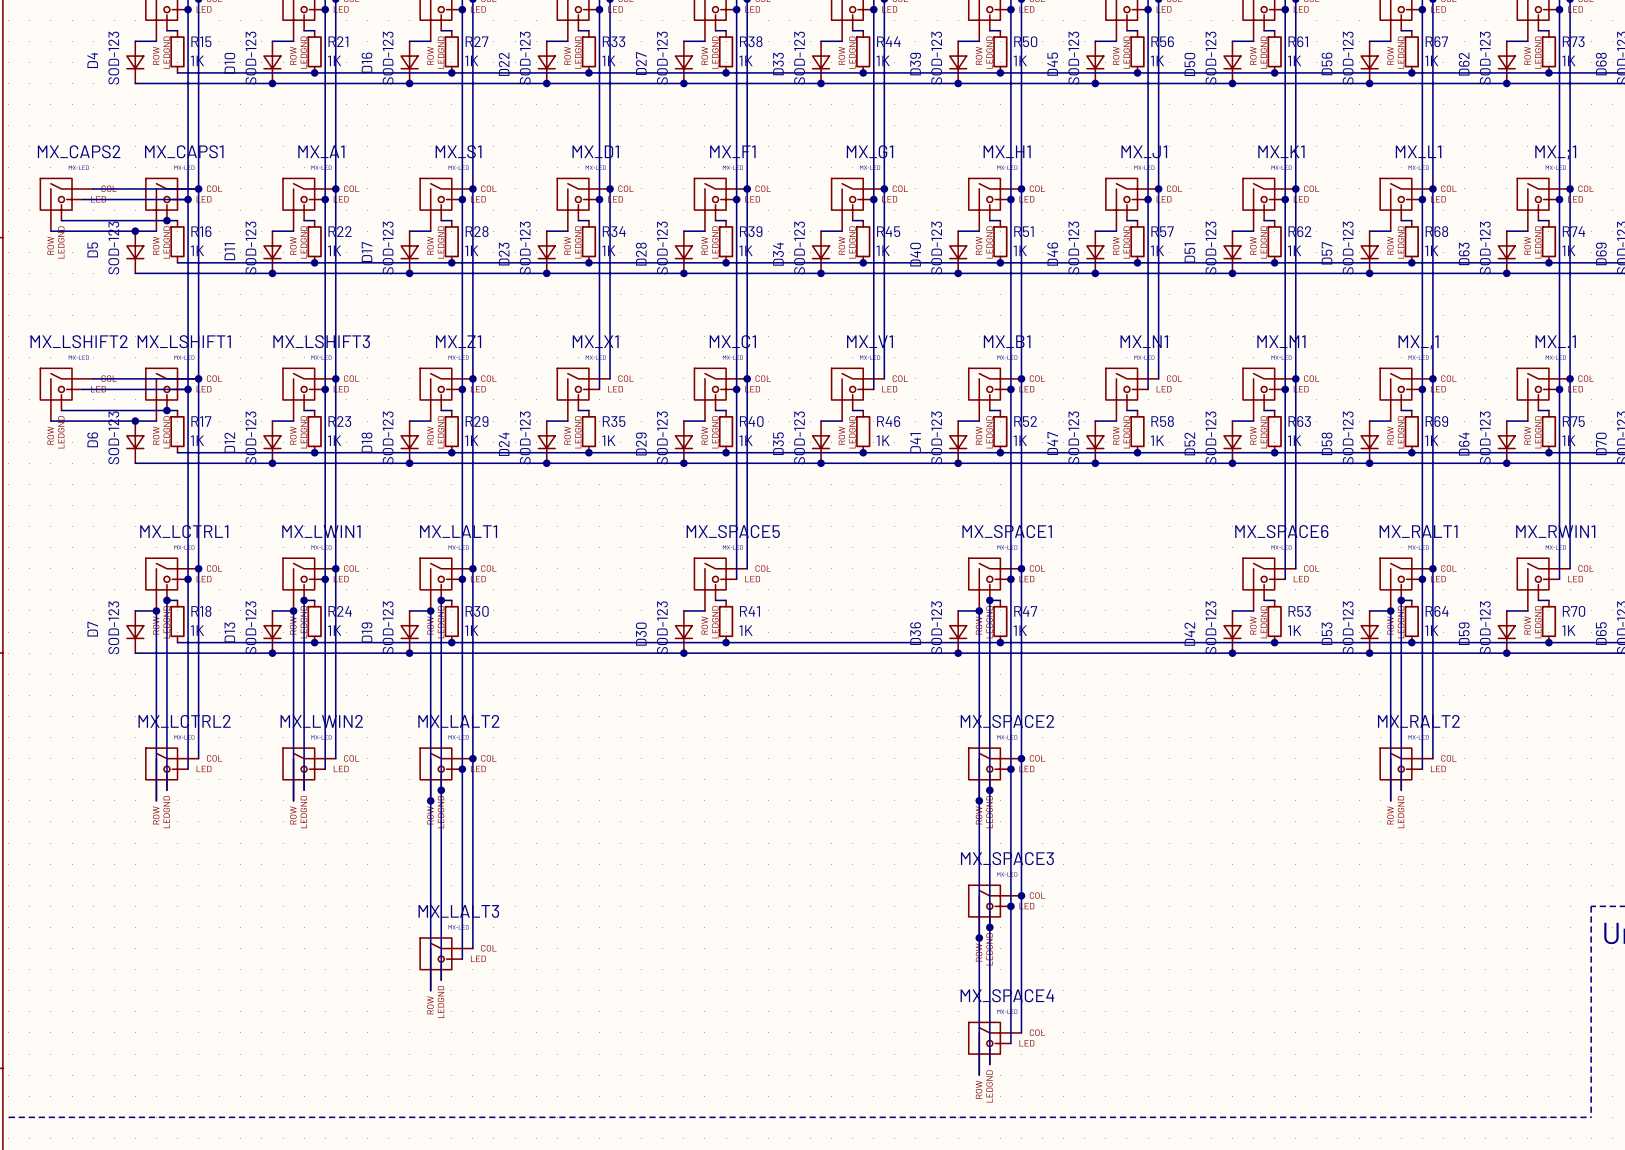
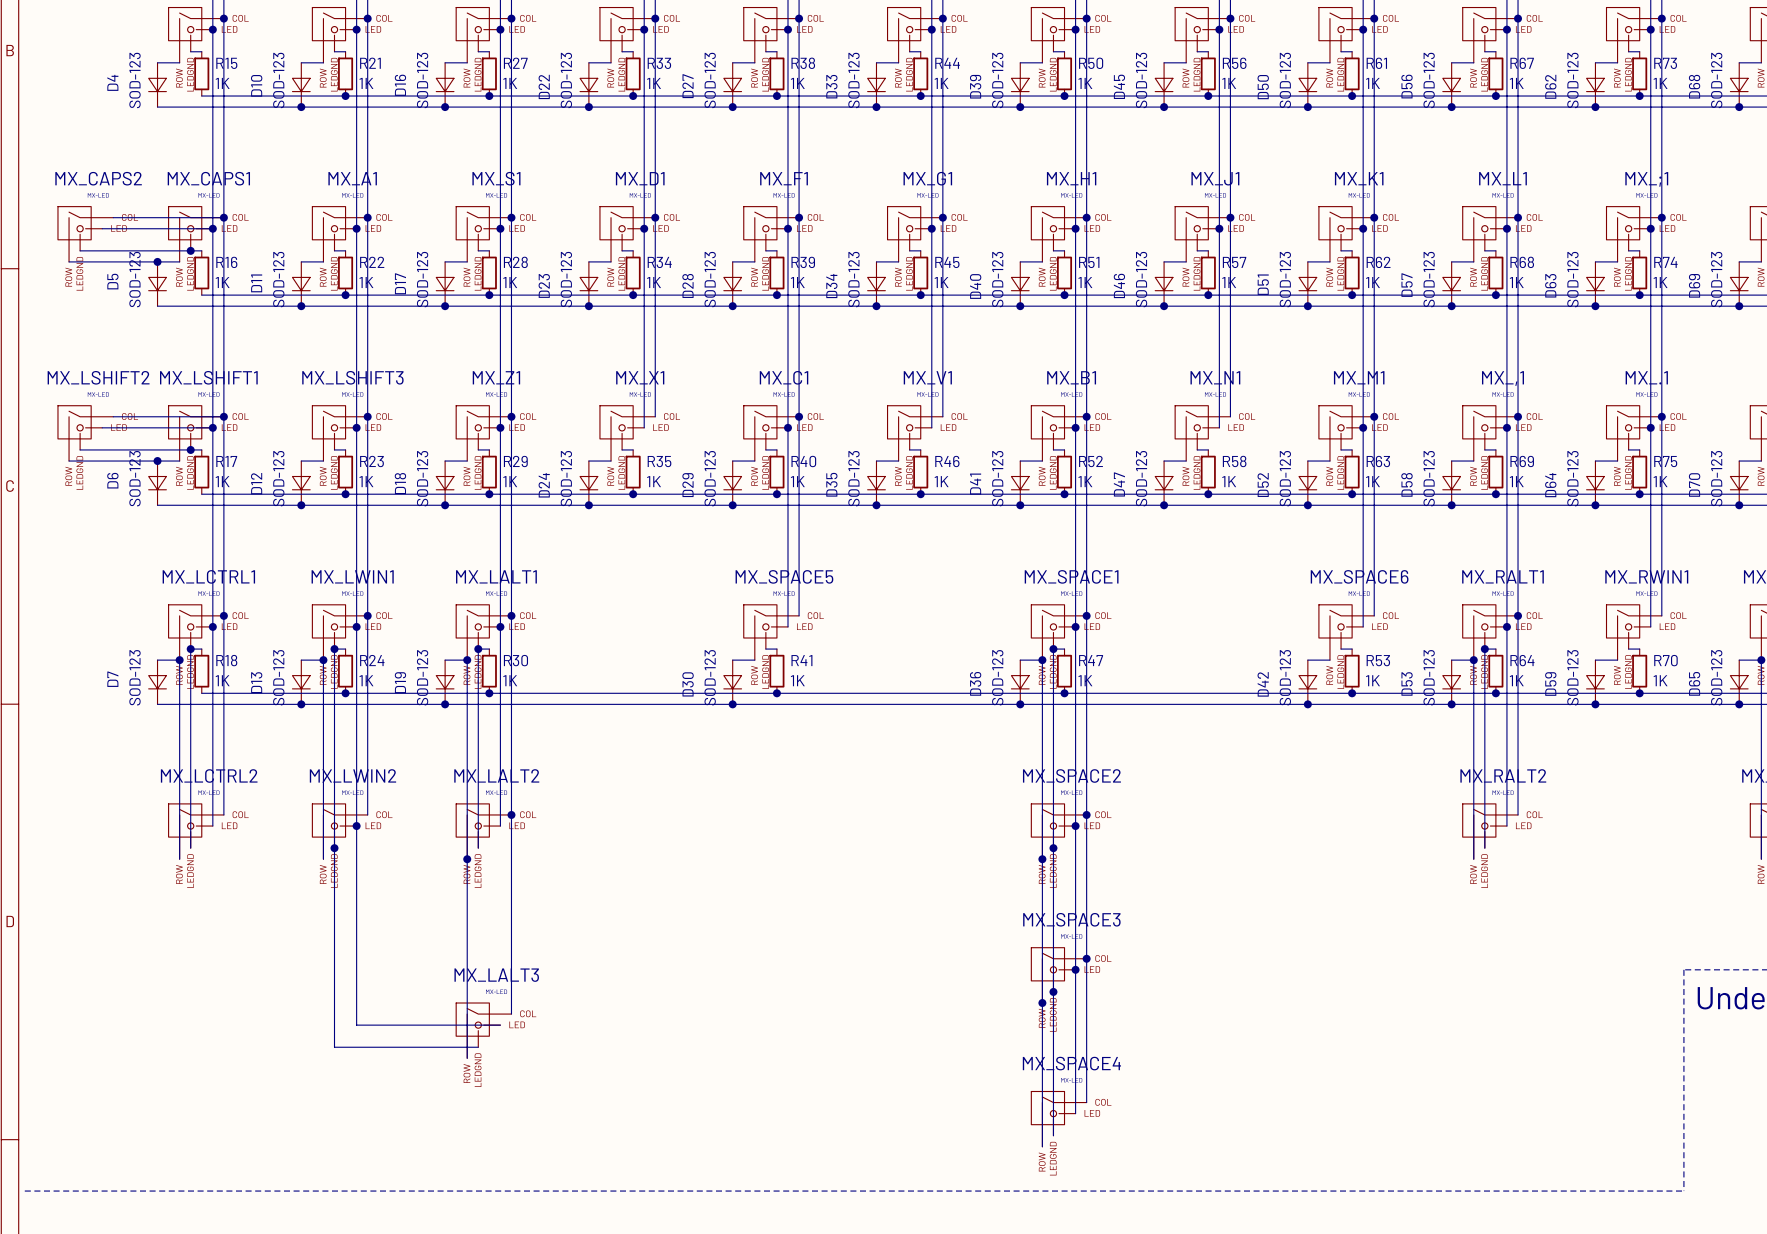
junction: none -> (356, 826)
wire: (462, 769) (462, 959) -> (356, 826) (356, 1025) (500, 1025)
junction: (462, 769) -> none
junction: none -> (334, 848)
wire: (441, 790) (441, 980) -> (334, 848) (334, 1047) (478, 1047)
junction: (441, 790) -> none

